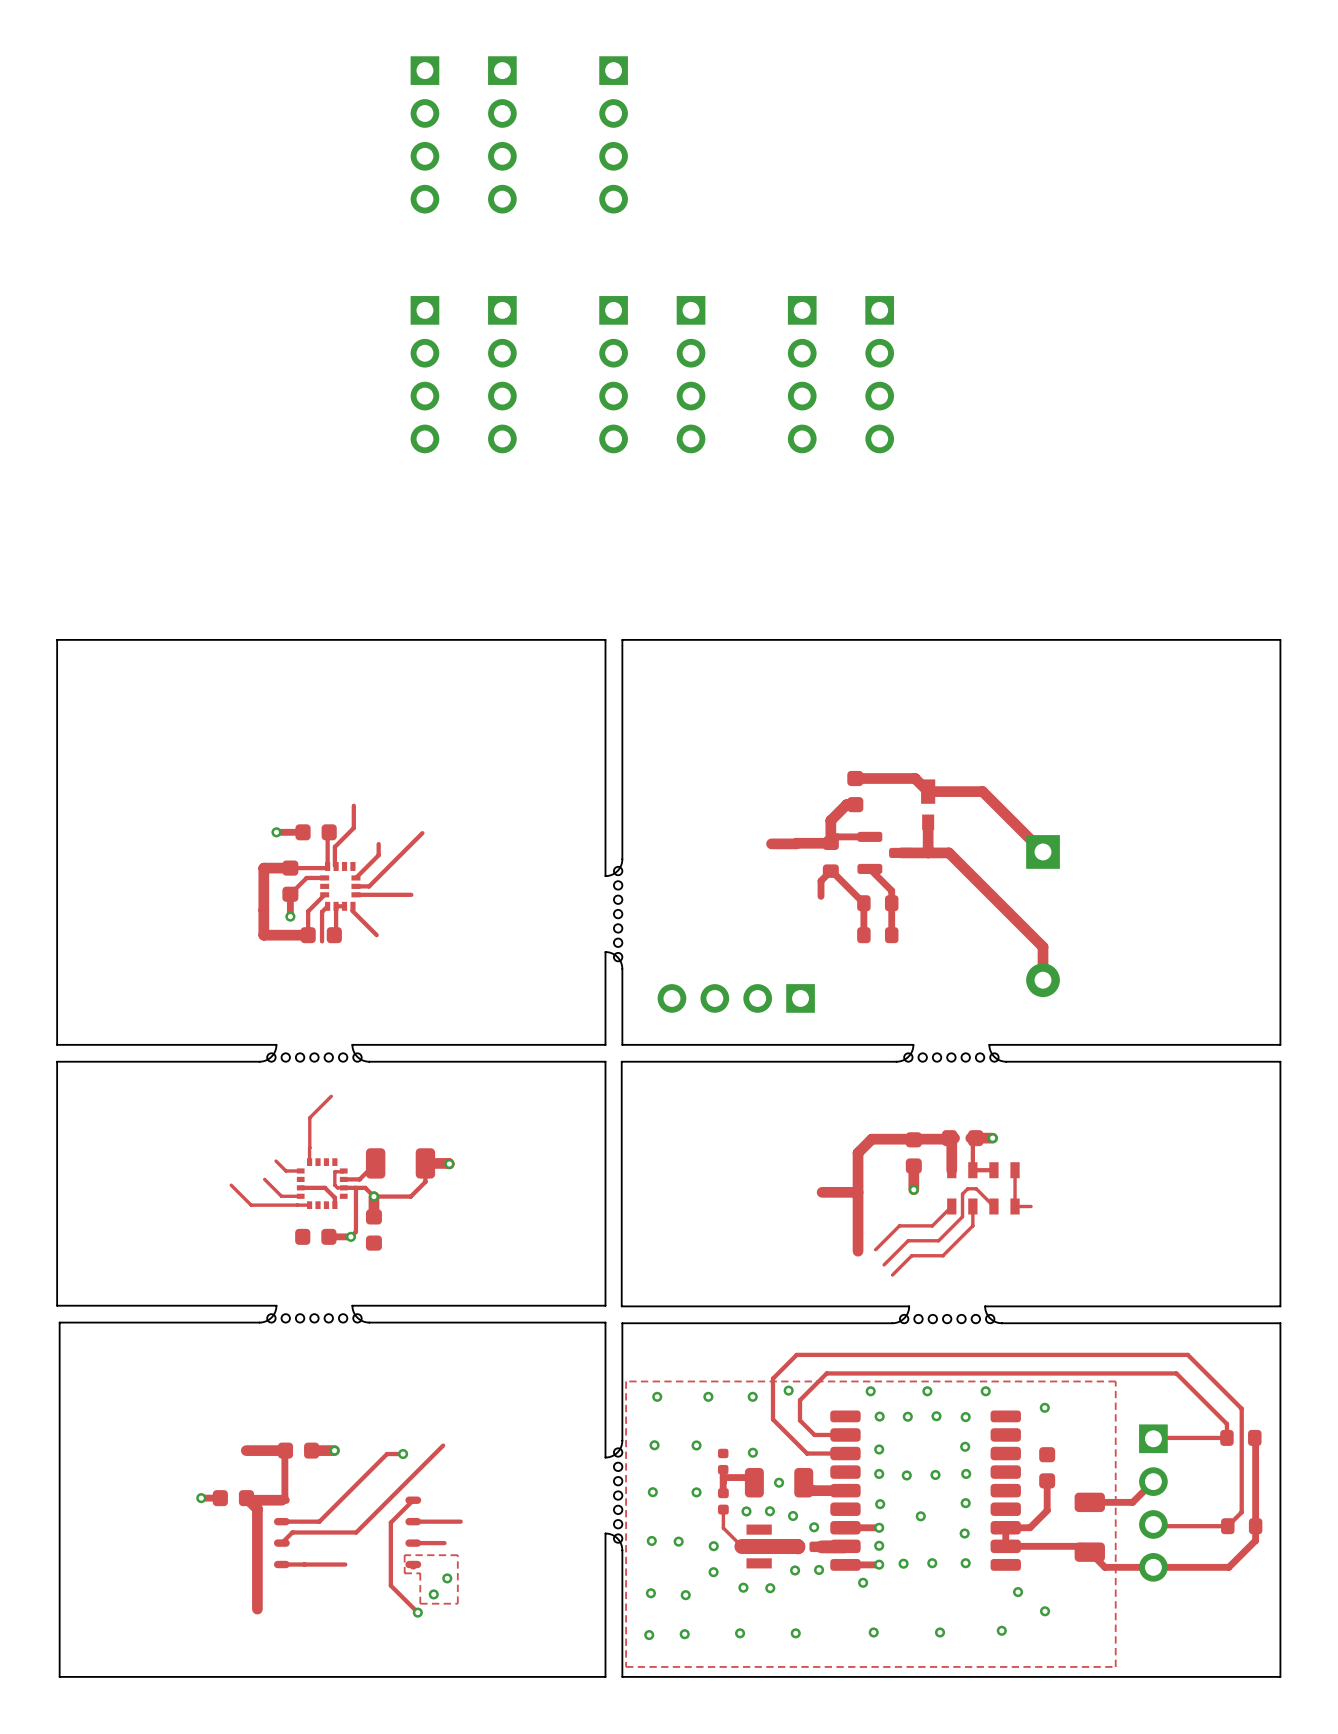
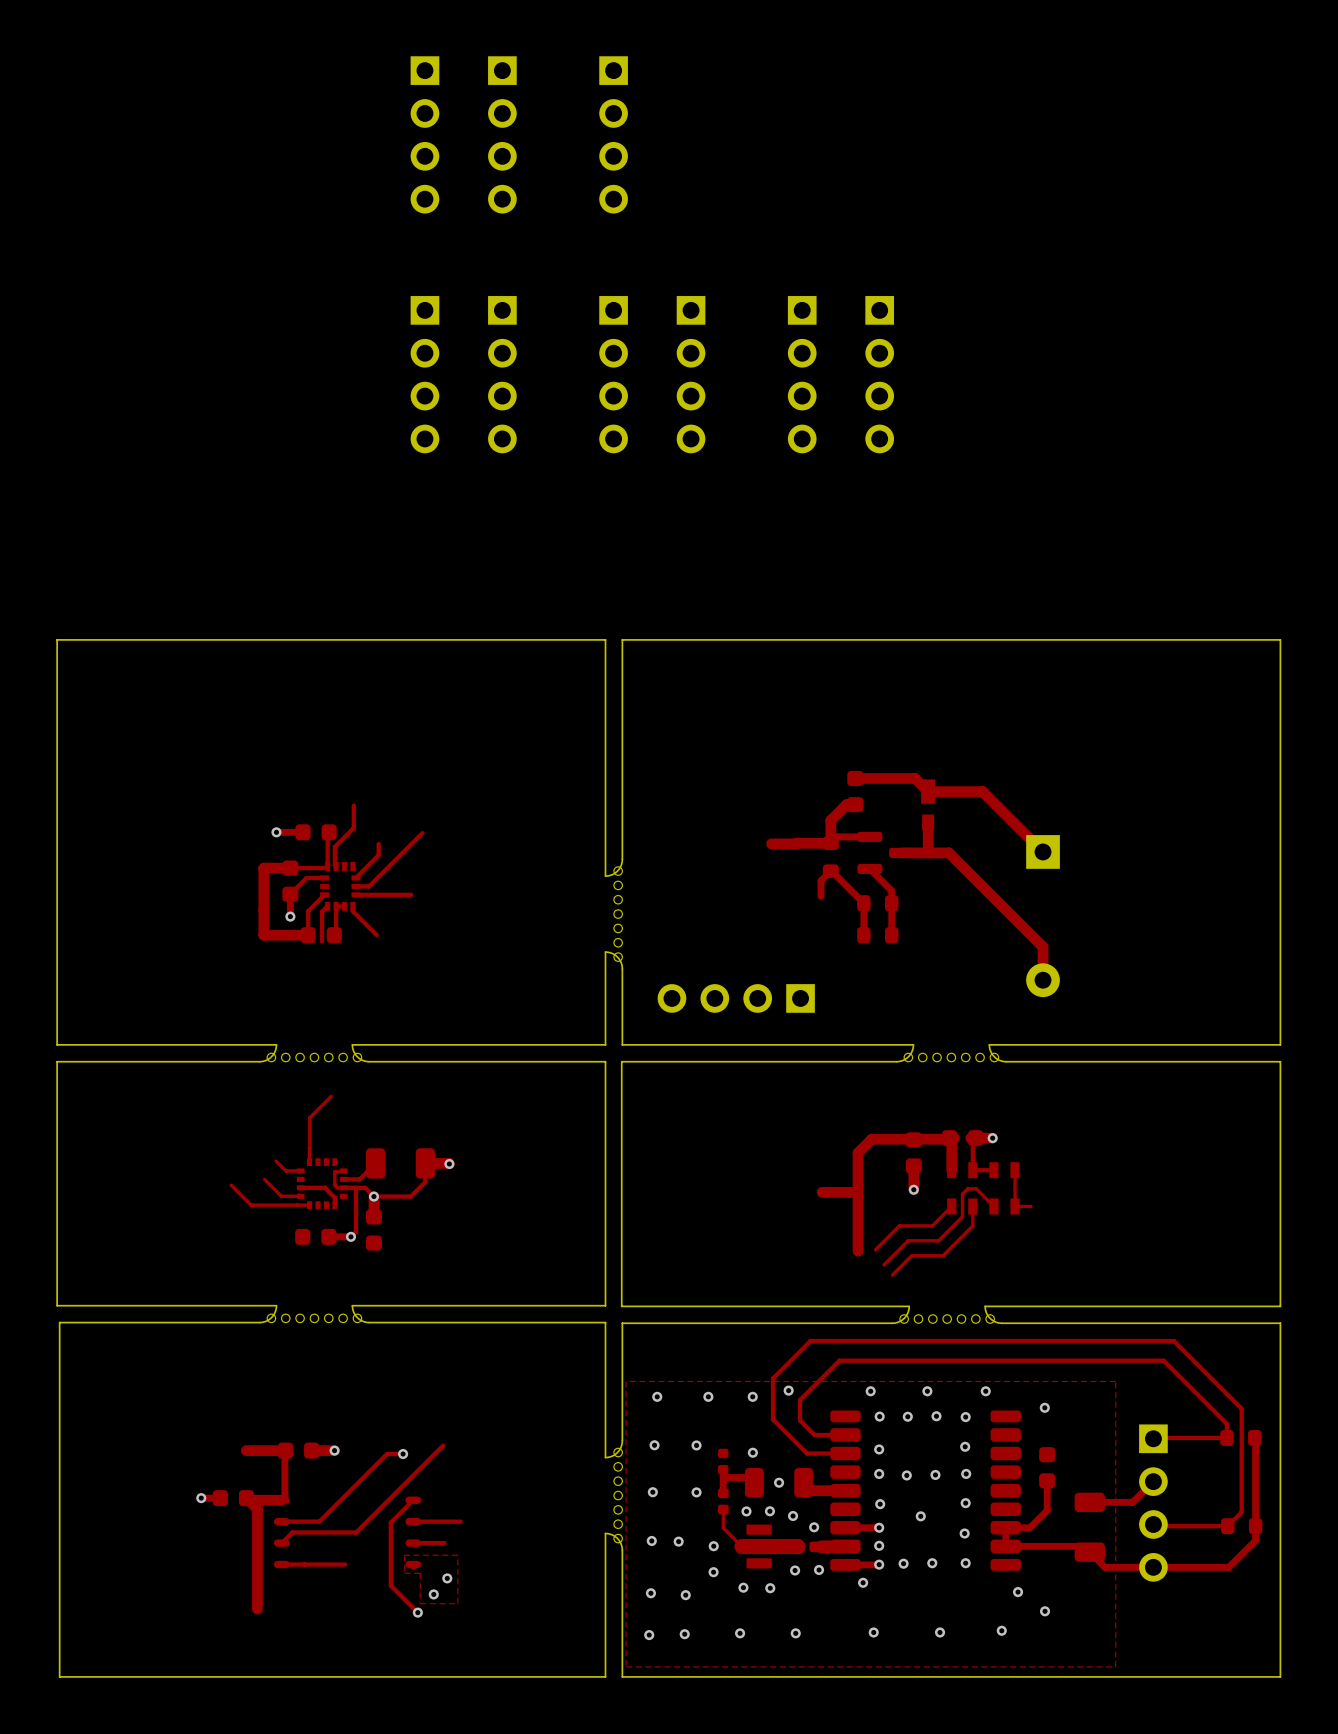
top track: (1187, 1354) (796, 1354) -> (1187, 1354) (1174, 1341) (810, 1341) (796, 1354)
top track: (1176, 1373) (826, 1373) -> (1176, 1373) (1163, 1360) (839, 1360) (826, 1373)

